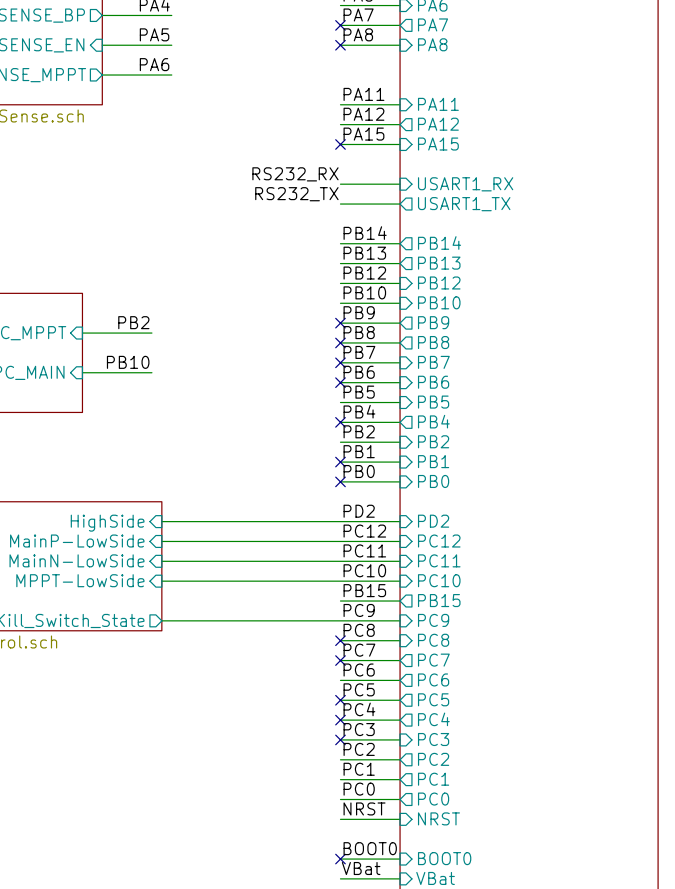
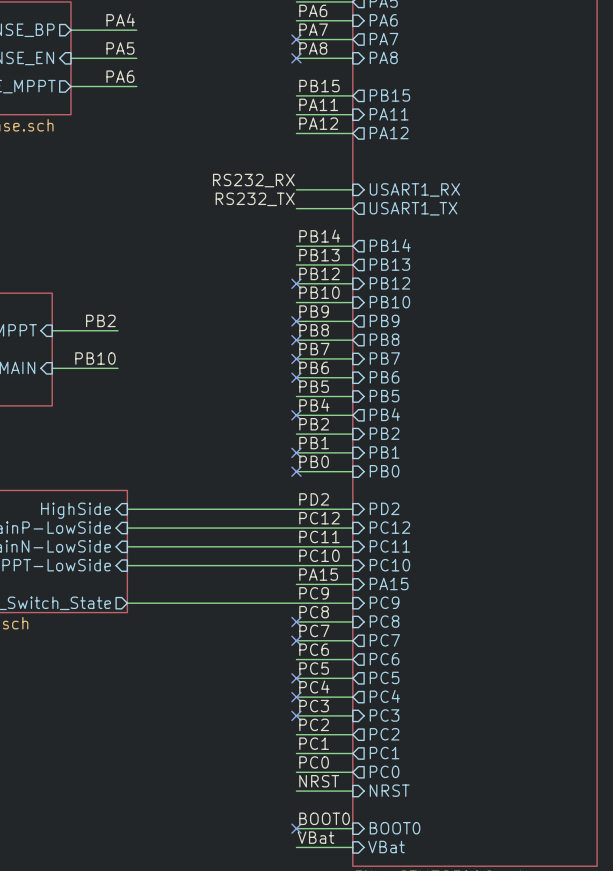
label: none -> PB15 (319, 86)
sheet pin: none -> PB15 (389, 95)
label: PA15 (363, 134) -> none
wire: (340, 144) (400, 144) -> (296, 95) (352, 95)
no-connect mark: (340, 144) -> none
sheet pin: PA15 (438, 144) -> none
no-connect mark: none -> (296, 283)
label: PB15 (364, 590) -> PA15 (318, 574)
sheet pin shape: output (439, 600) -> input (389, 583)
sheet pin: PB15 (439, 600) -> PA15 (389, 583)

